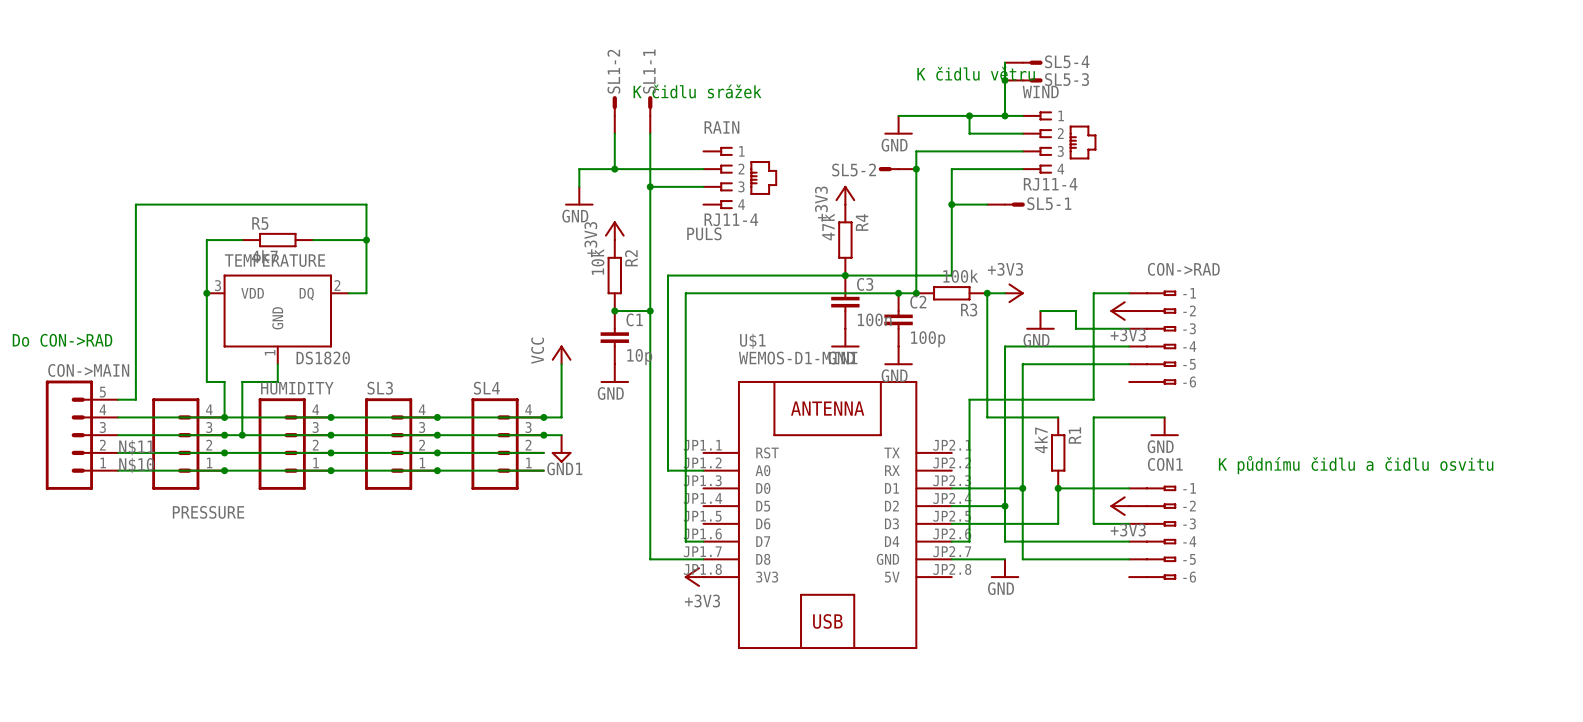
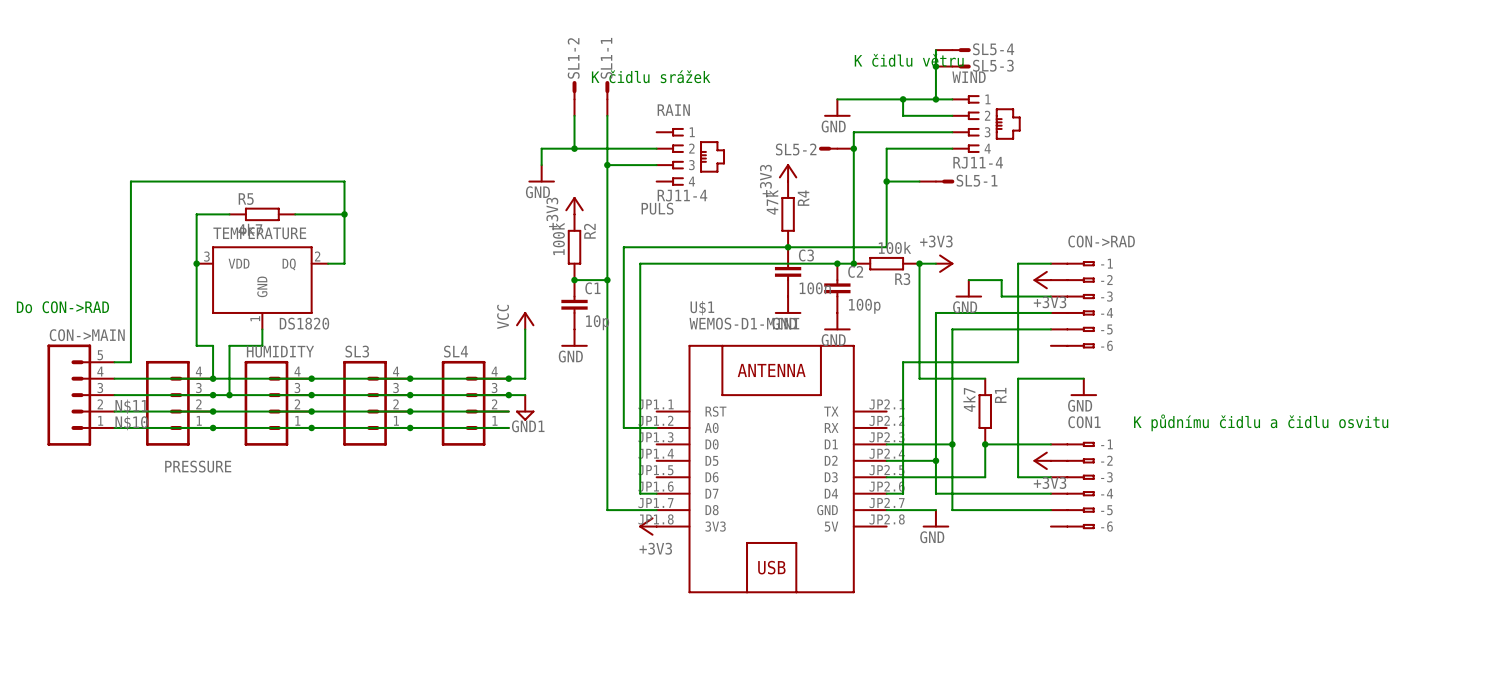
R2 value: 10k (597, 261) -> 100k (558, 238)

